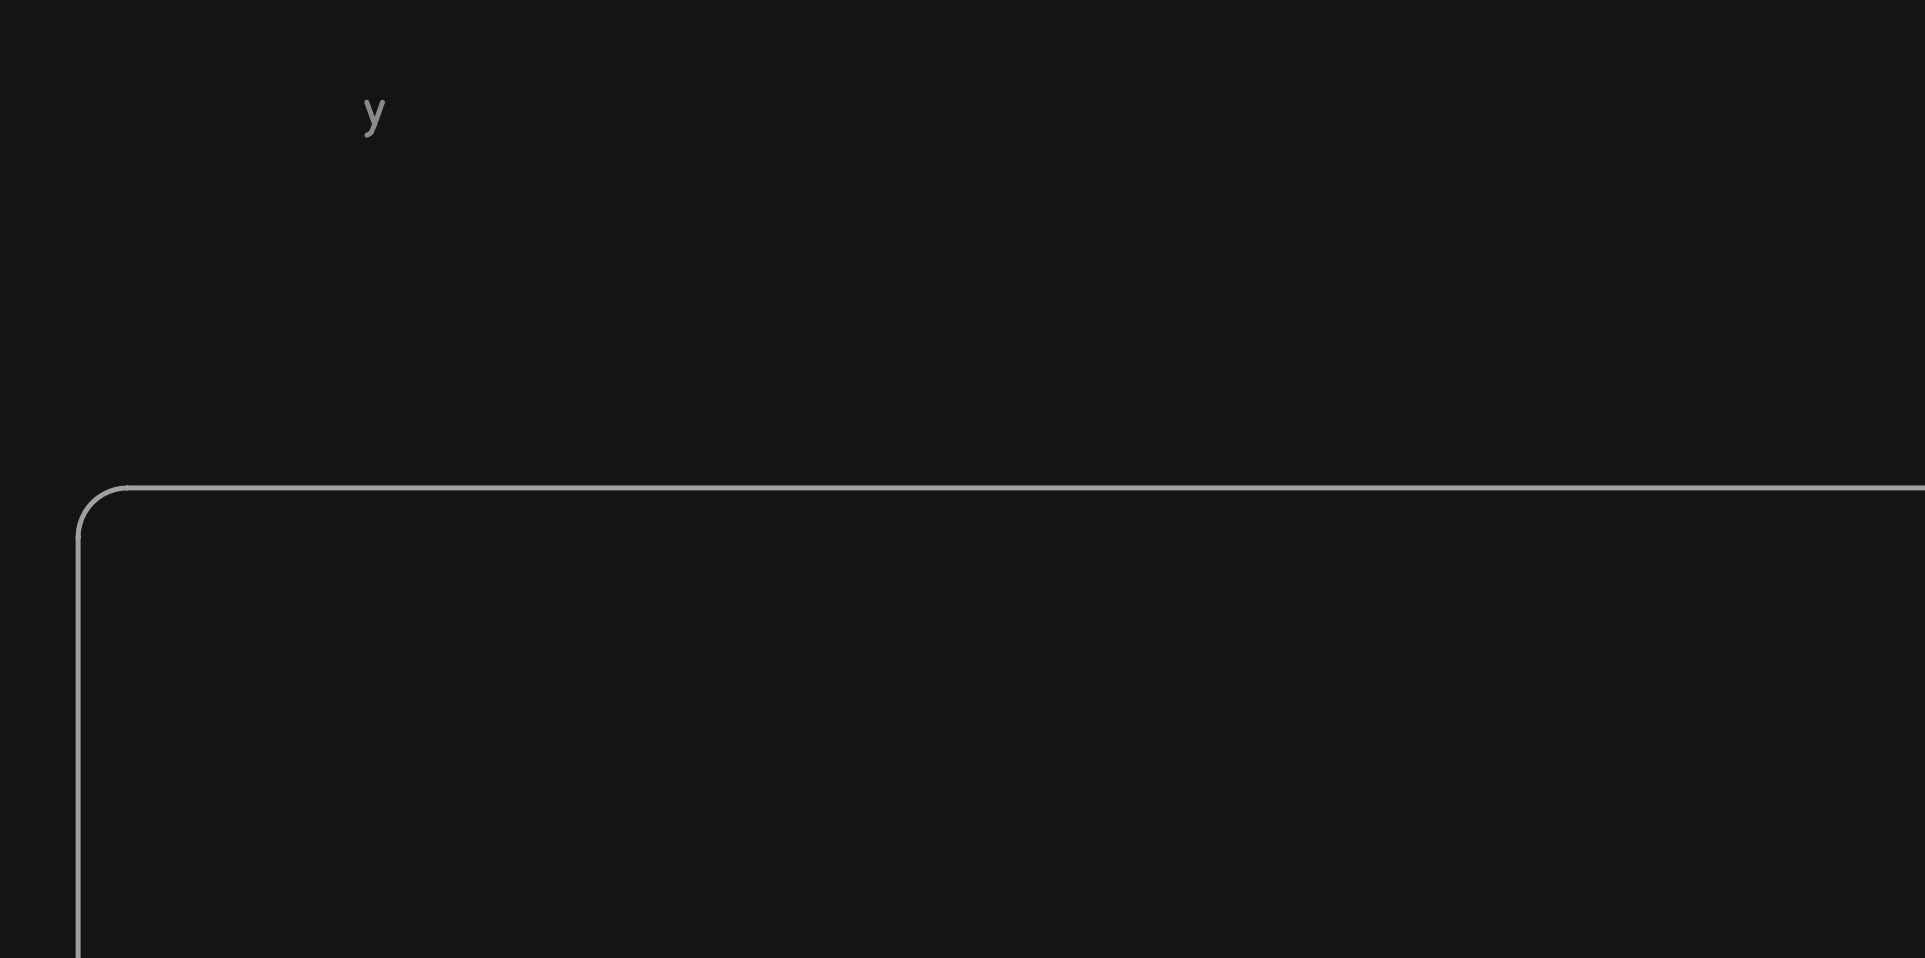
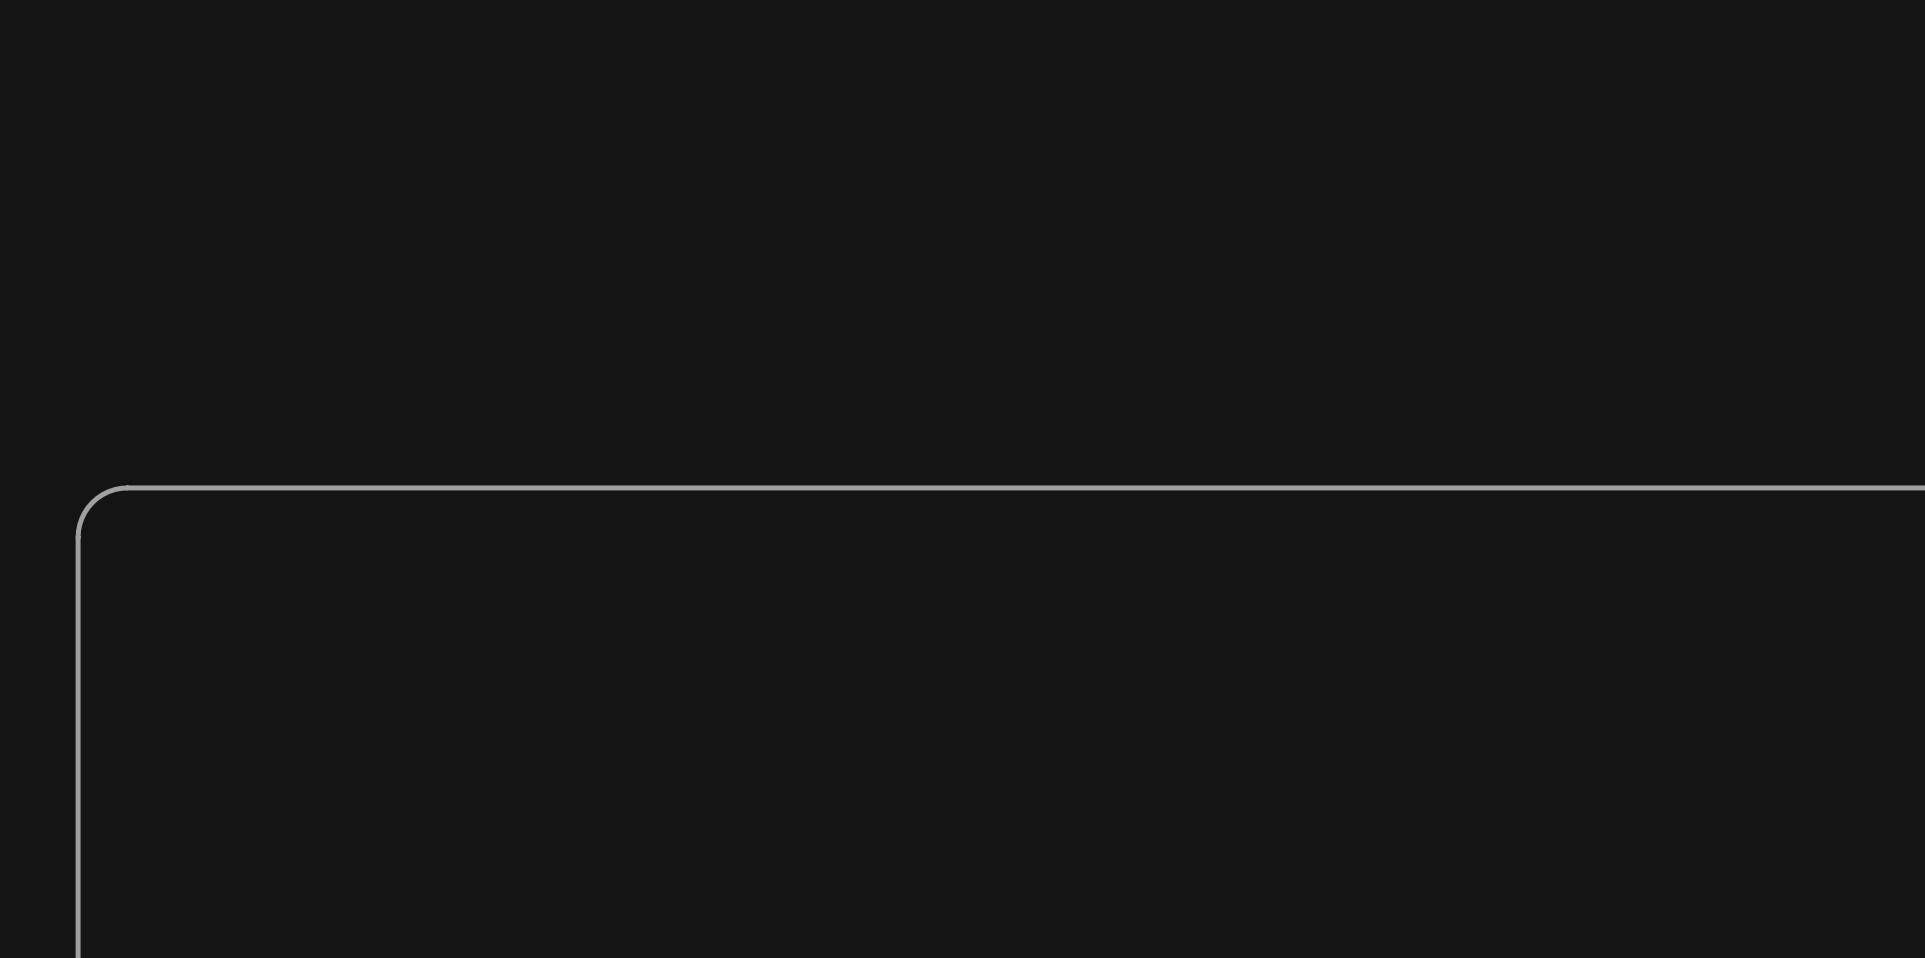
drawing: [364, 99, 385, 138] -> none

